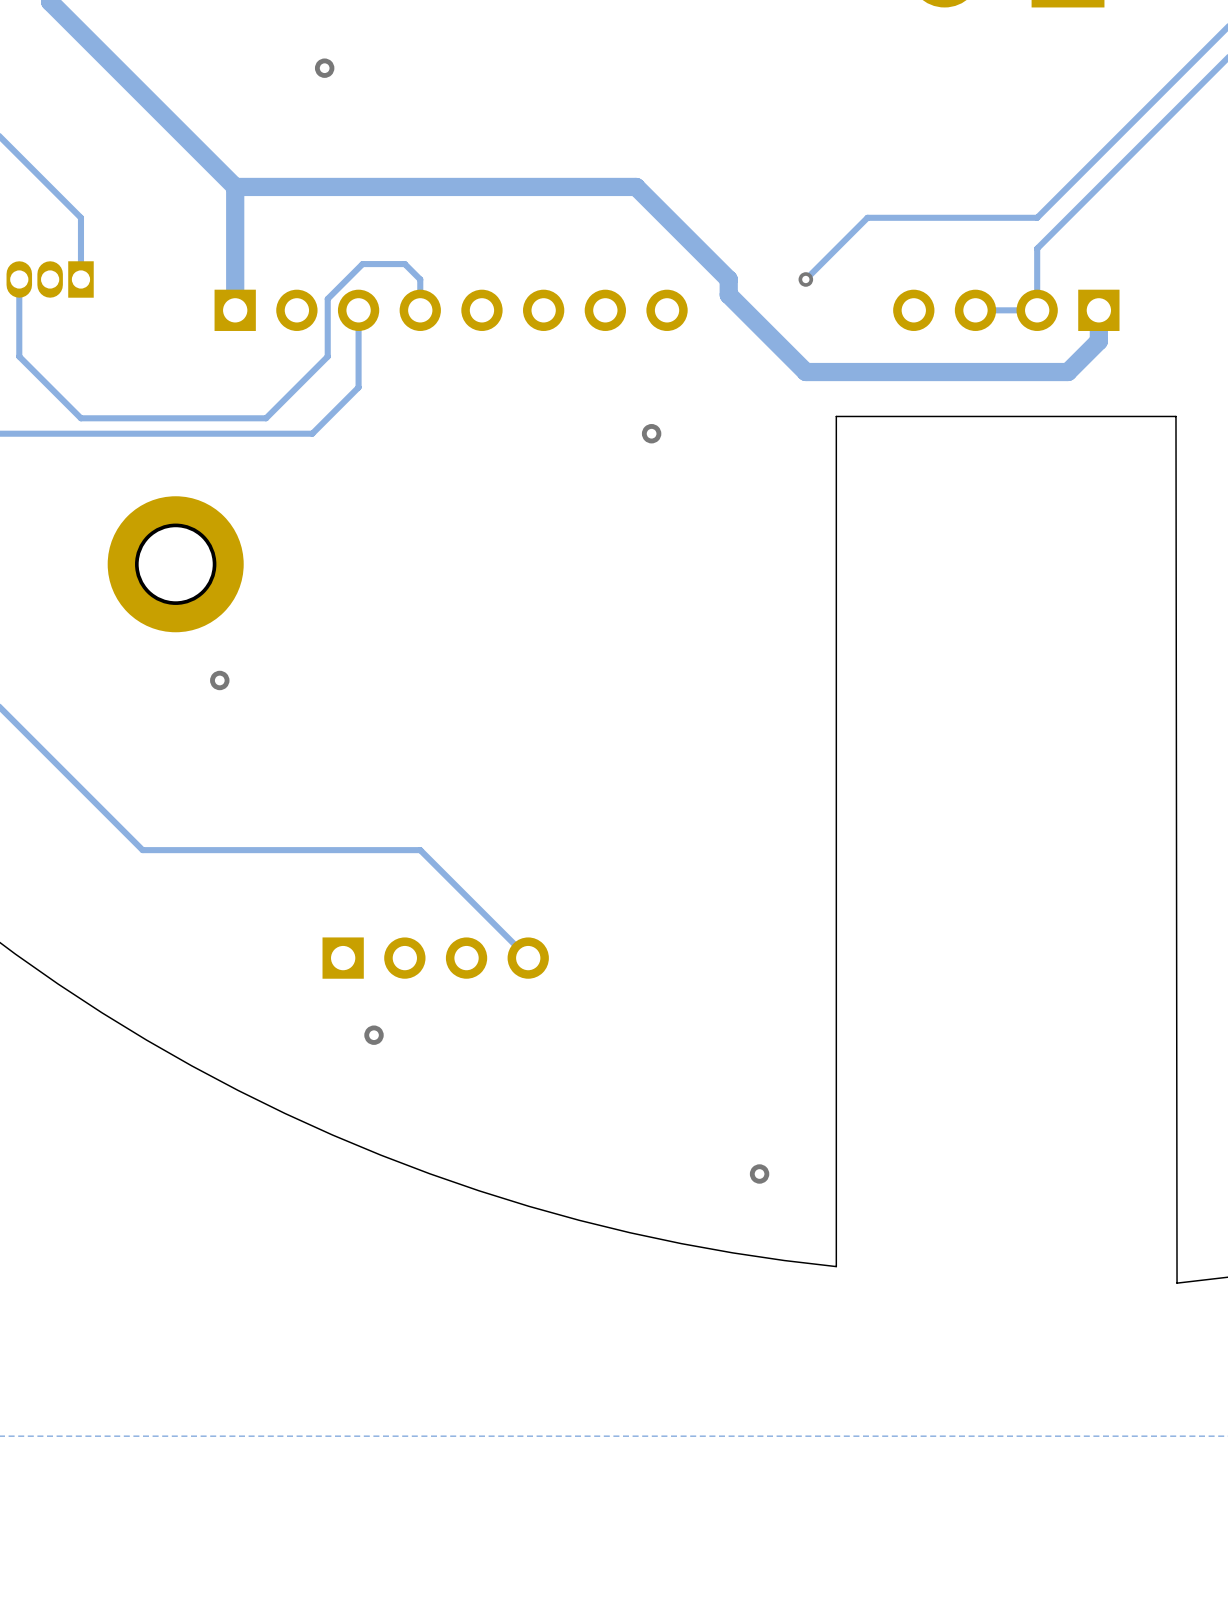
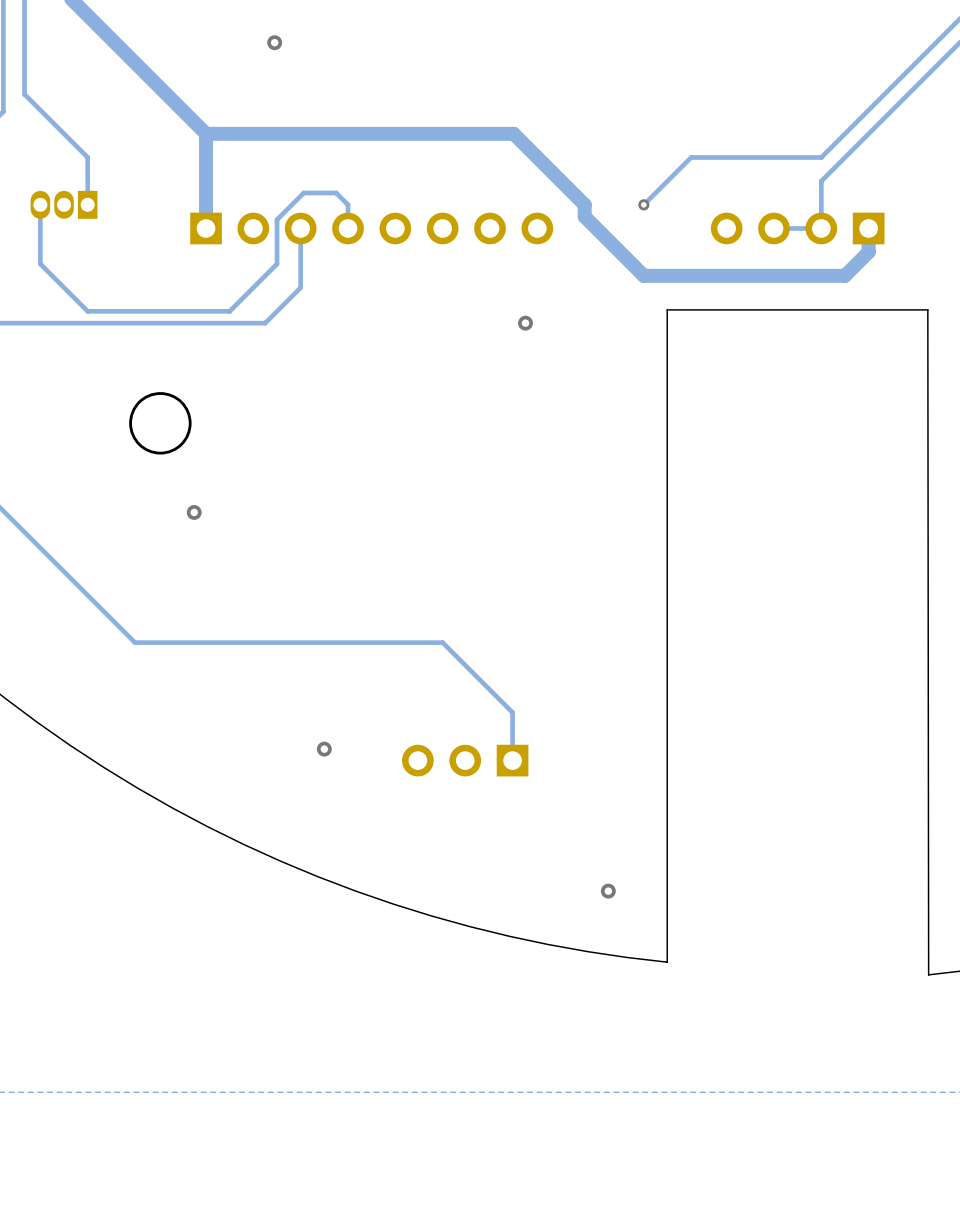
part: (175, 564) -> none
track: (420, 850) (528, 958) -> (348, 642) (442, 642) (512, 712) (512, 760)
part: (435, 958) -> none
part: none -> (465, 760)
via position: (374, 1035) -> (324, 749)

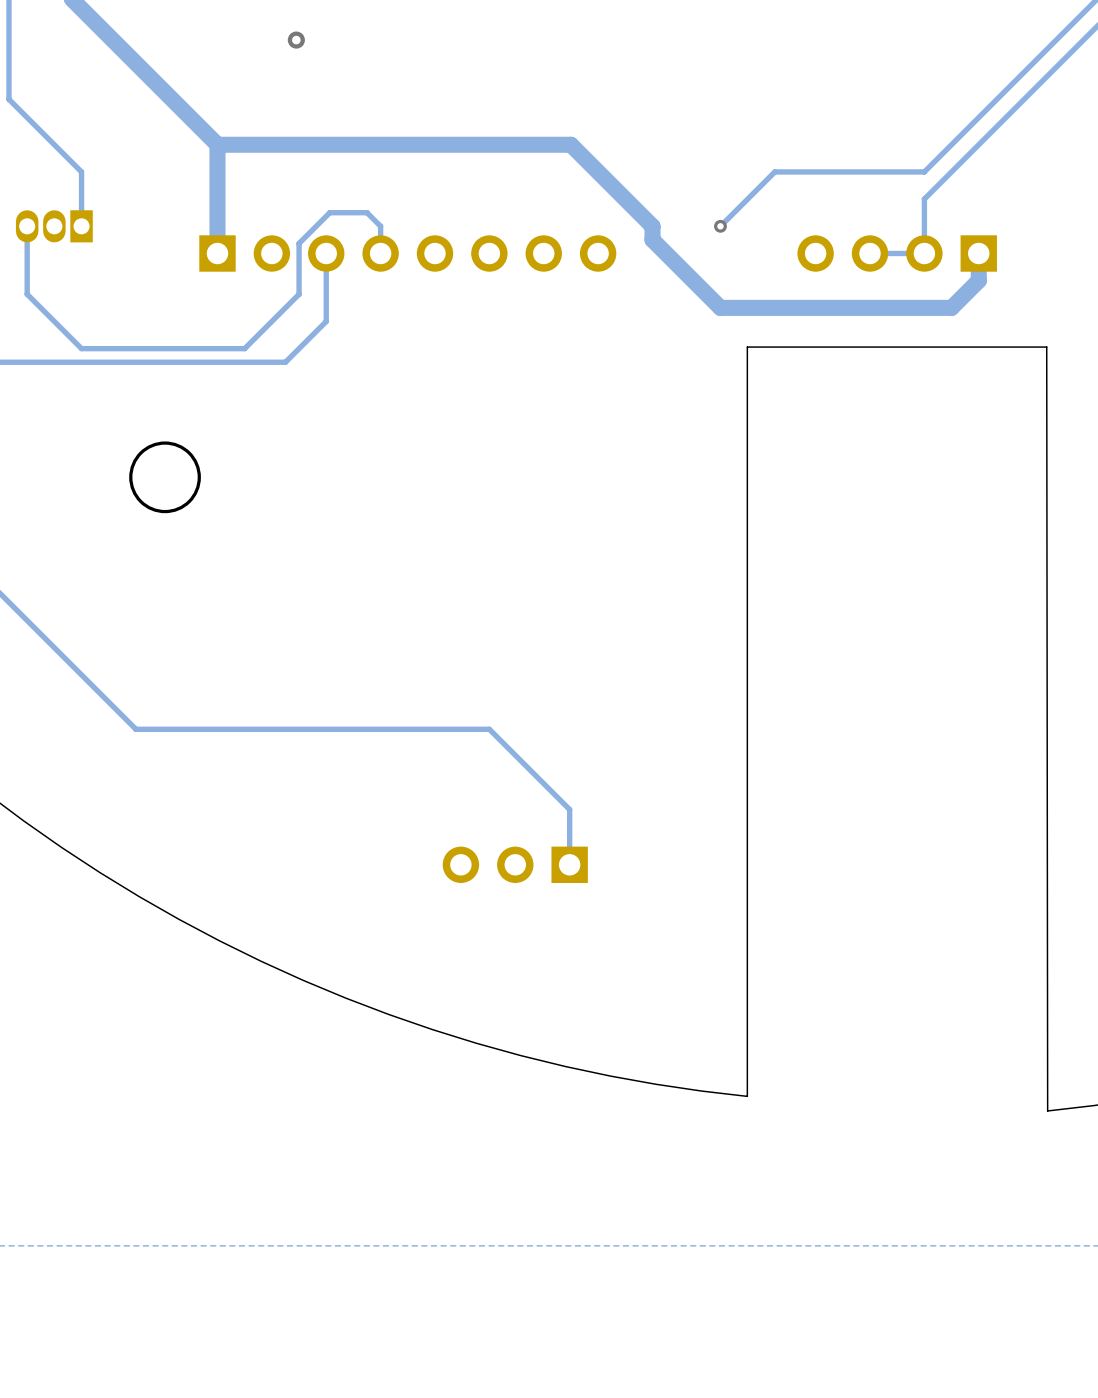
via: (525, 323) -> none
via: (194, 512) -> none
via: (324, 749) -> none
via: (608, 891) -> none

